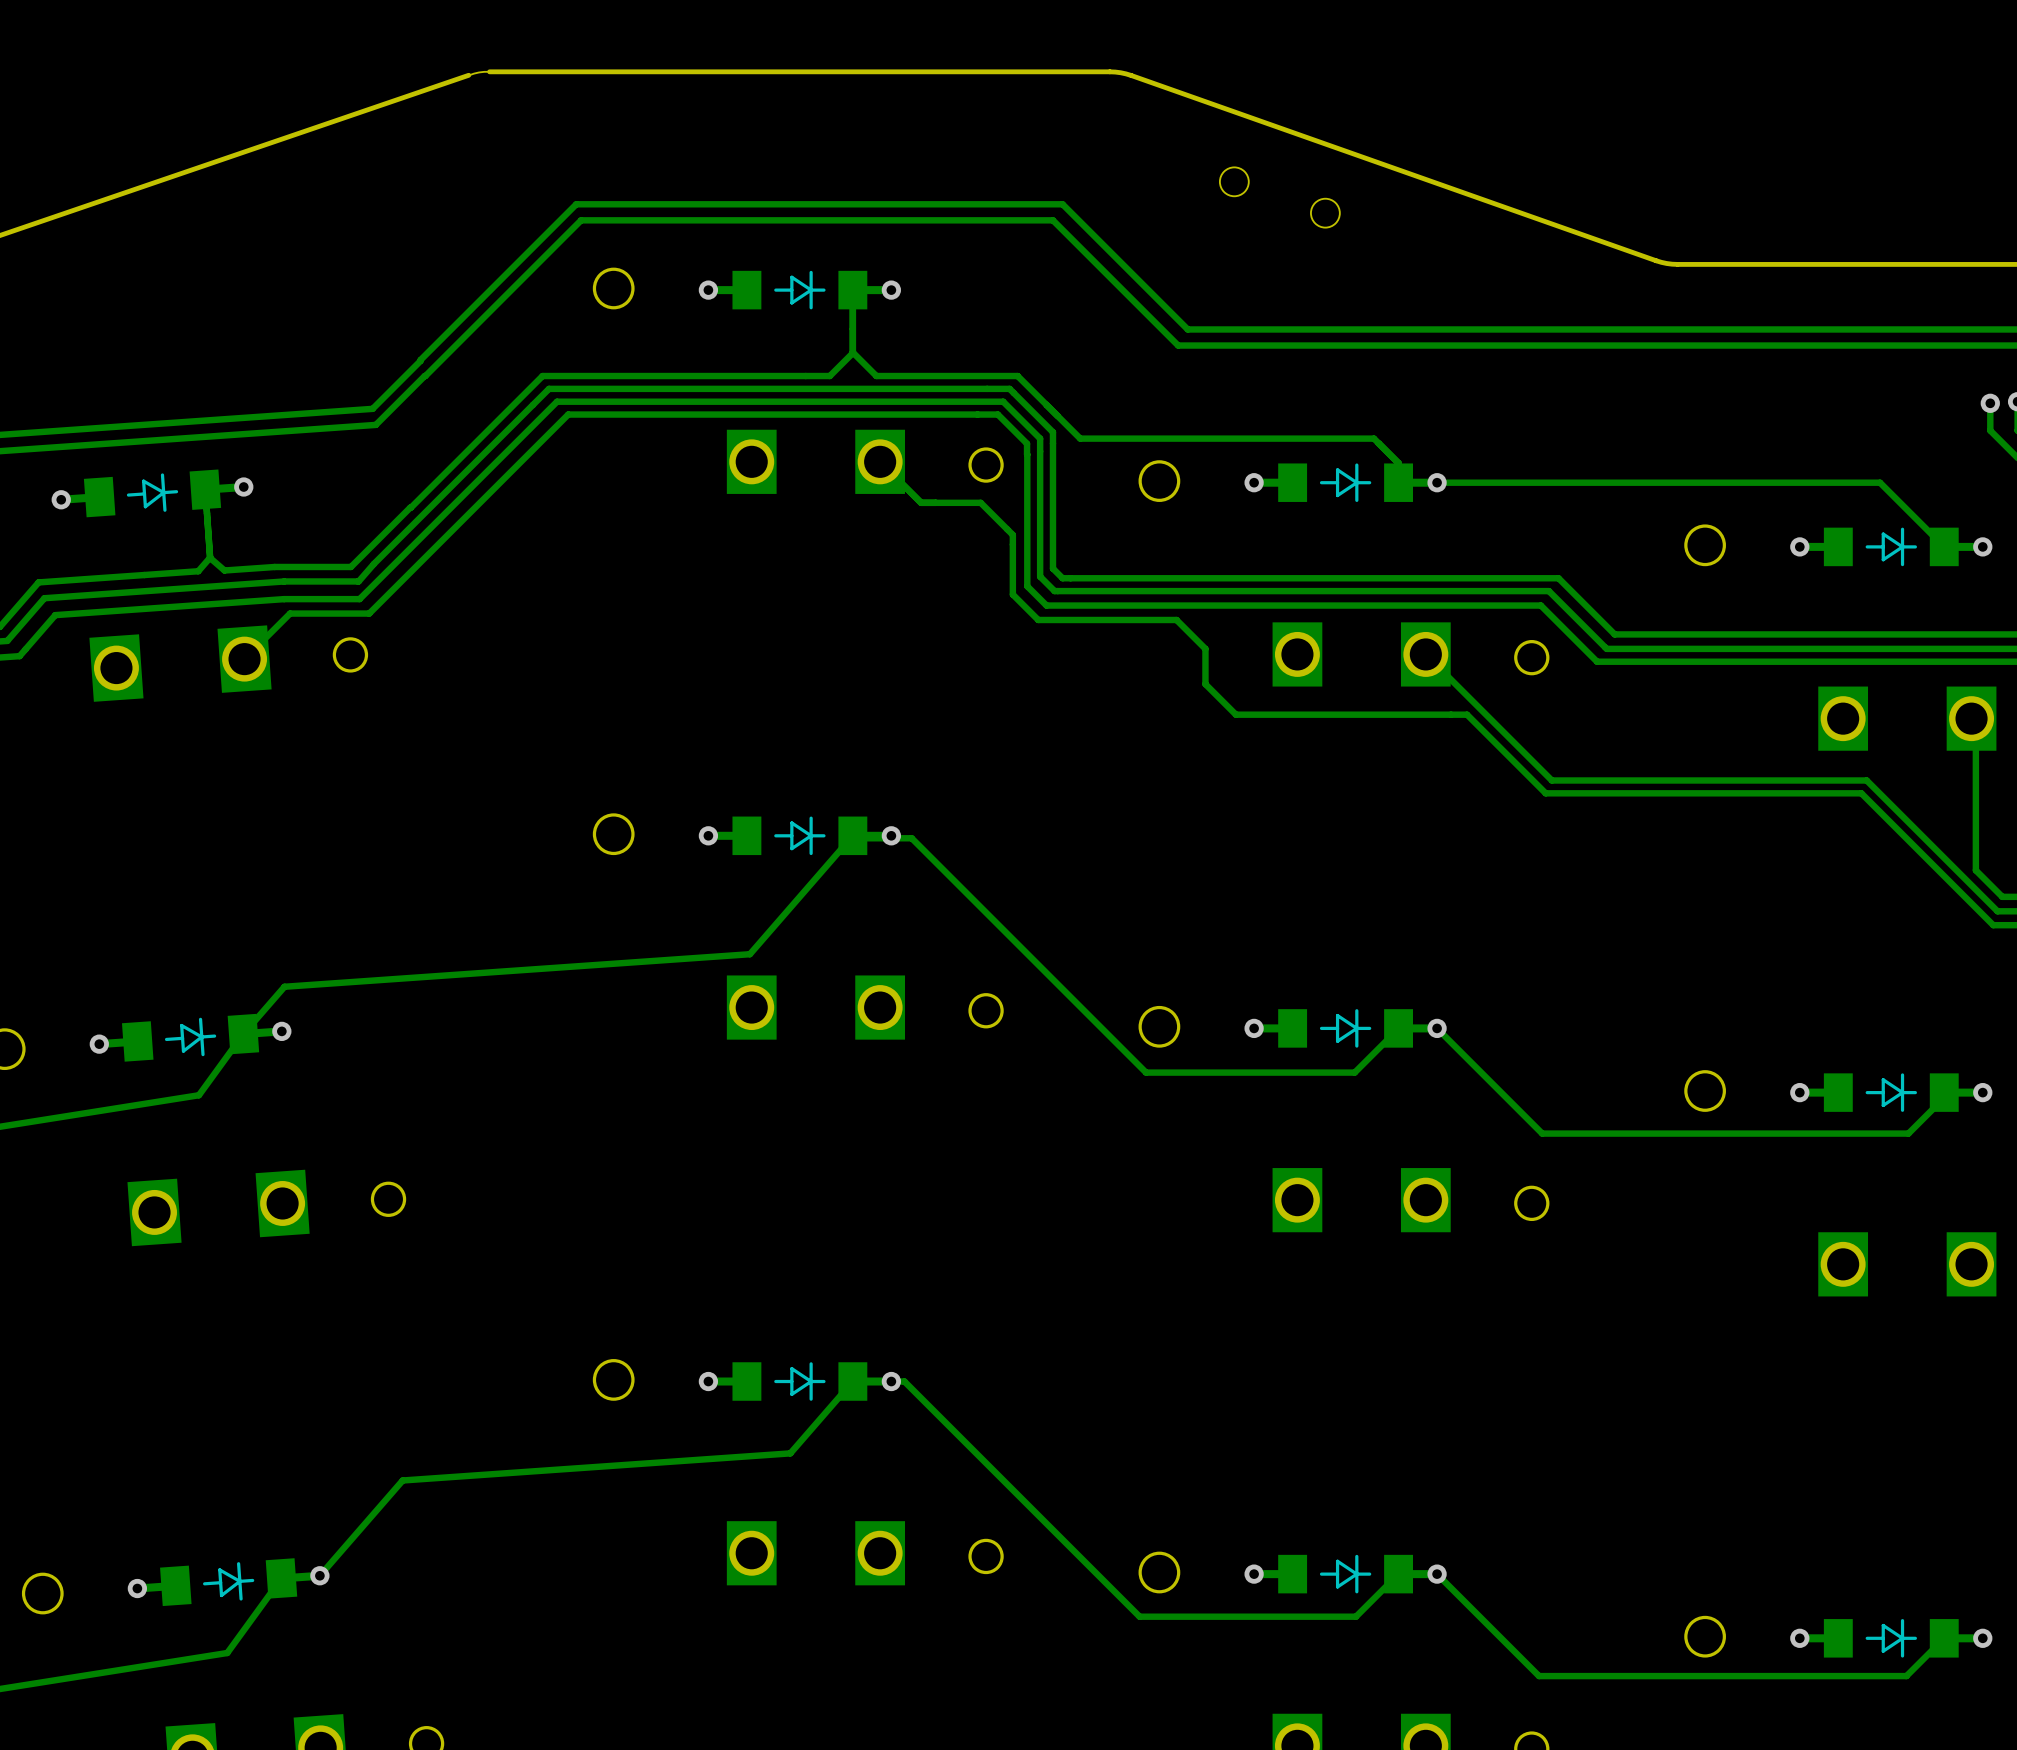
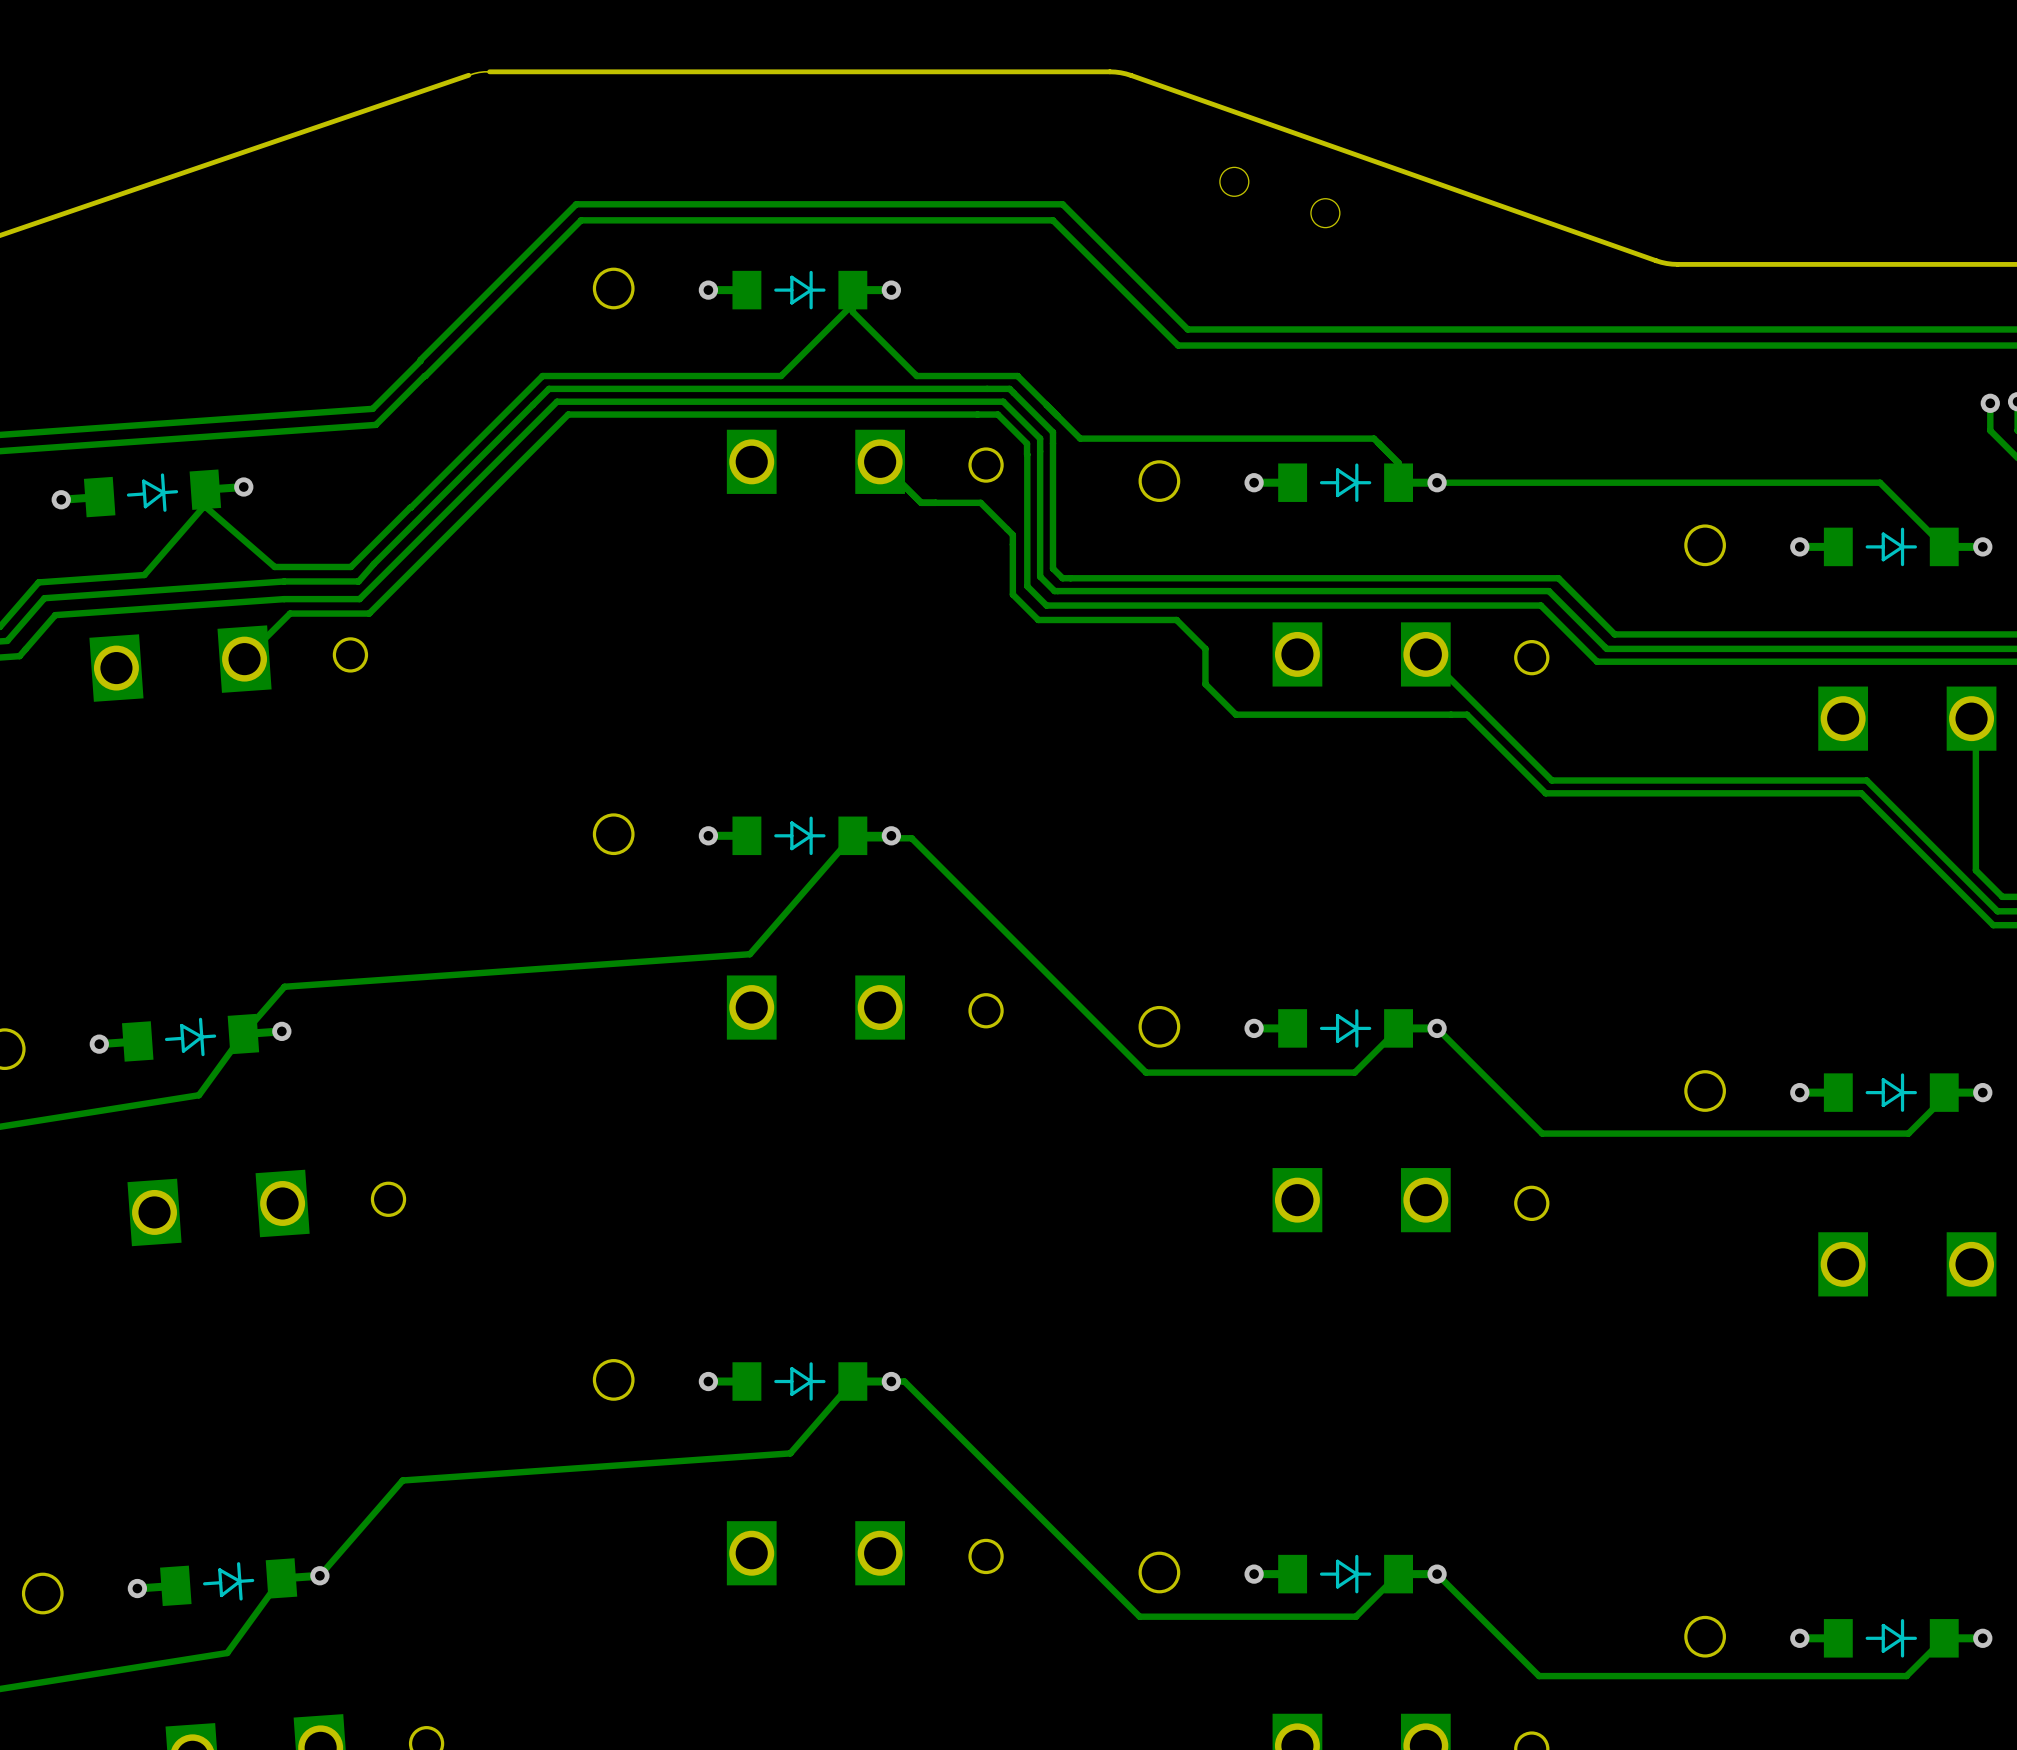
track: (852, 312) (852, 353) (829, 376) (781, 376) -> (852, 304) (781, 376)
track: (852, 352) (876, 376) (916, 376) -> (852, 312) (916, 376)
track: (206, 507) (210, 557) (198, 571) (144, 575) -> (206, 503) (144, 575)
track: (210, 557) (224, 570) (274, 566) -> (206, 507) (274, 566)

